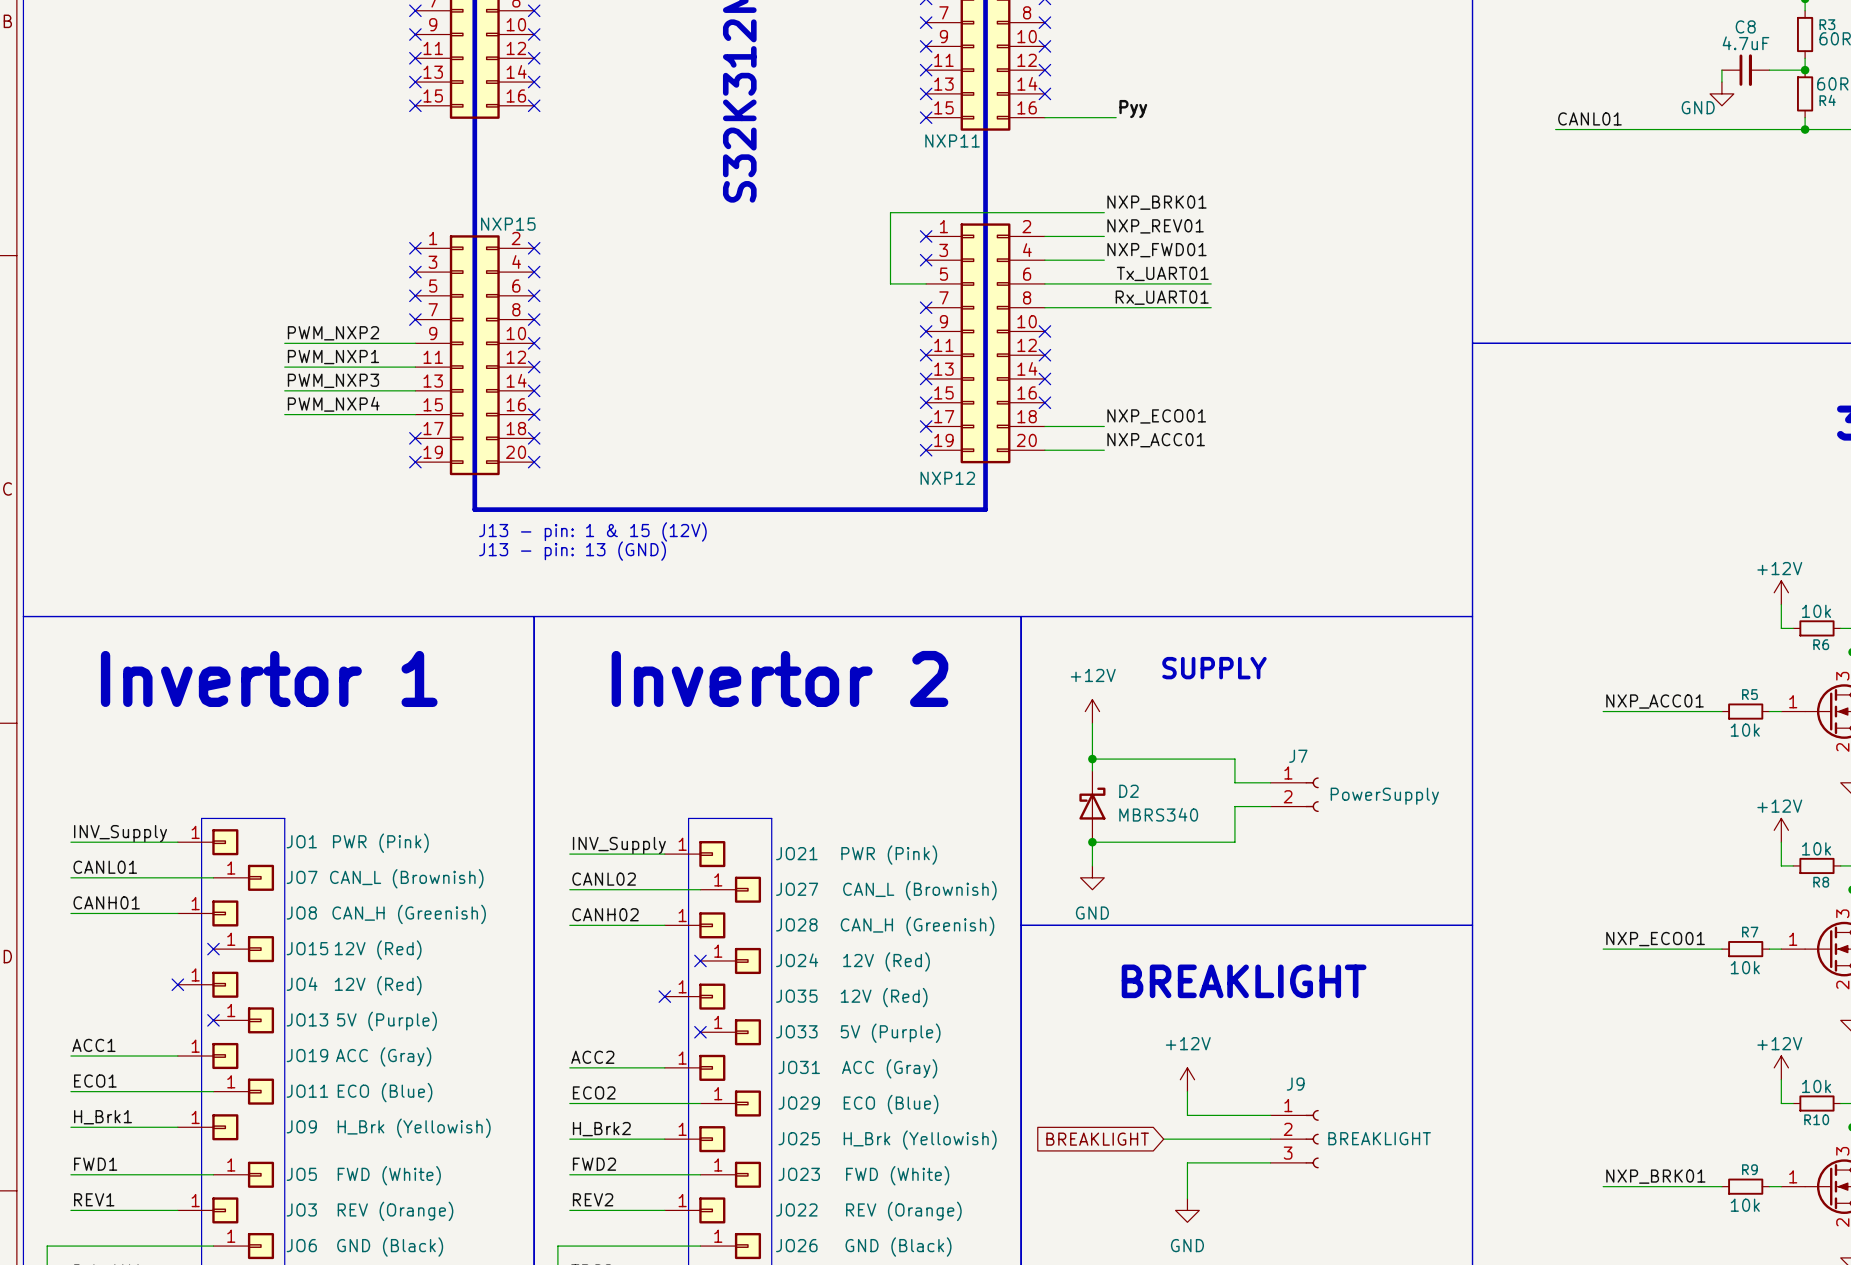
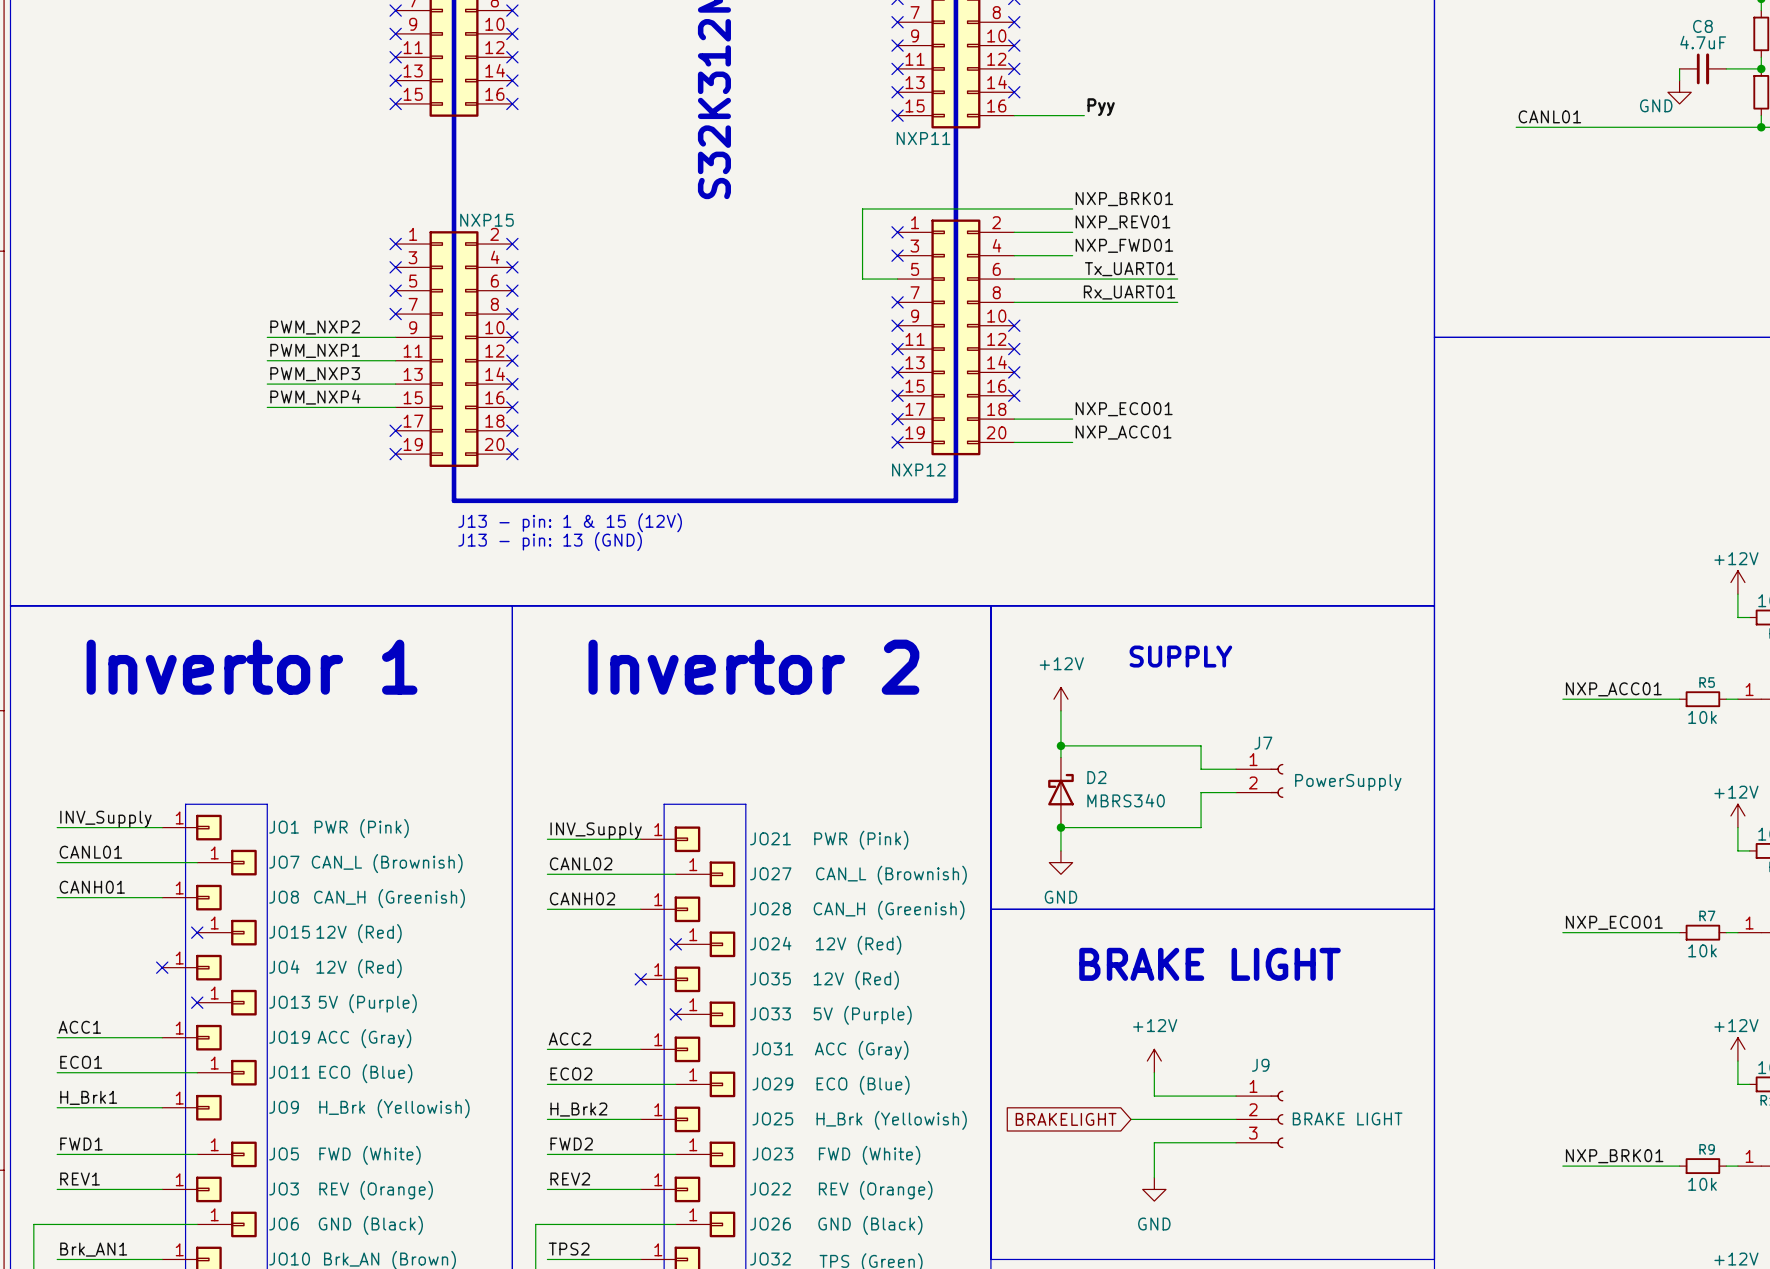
text: BREAKLIGHT (1244, 981) -> BRAKE LIGHT (1210, 964)
J9 value: BREAKLIGHT (1379, 1138) -> BRAKE LIGHT (1347, 1118)
global label: BREAKLIGHT (1097, 1139) -> BRAKELIGHT (1066, 1119)

